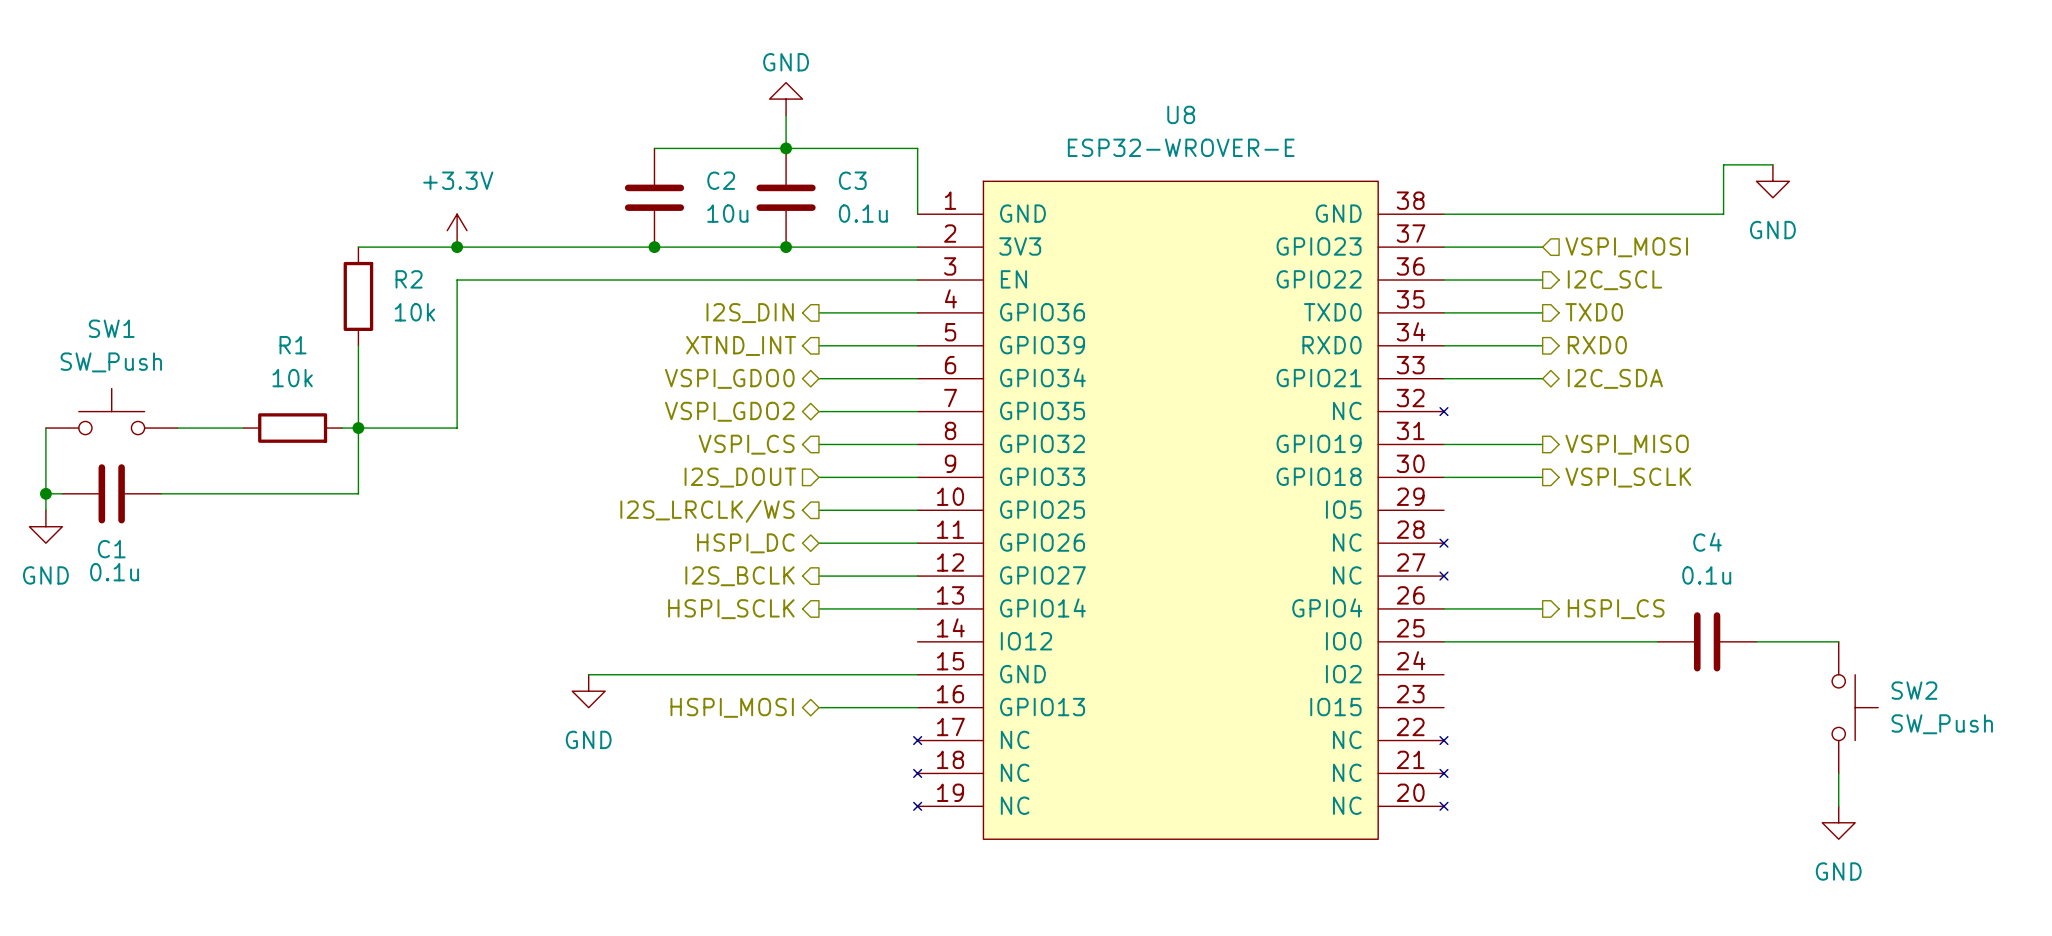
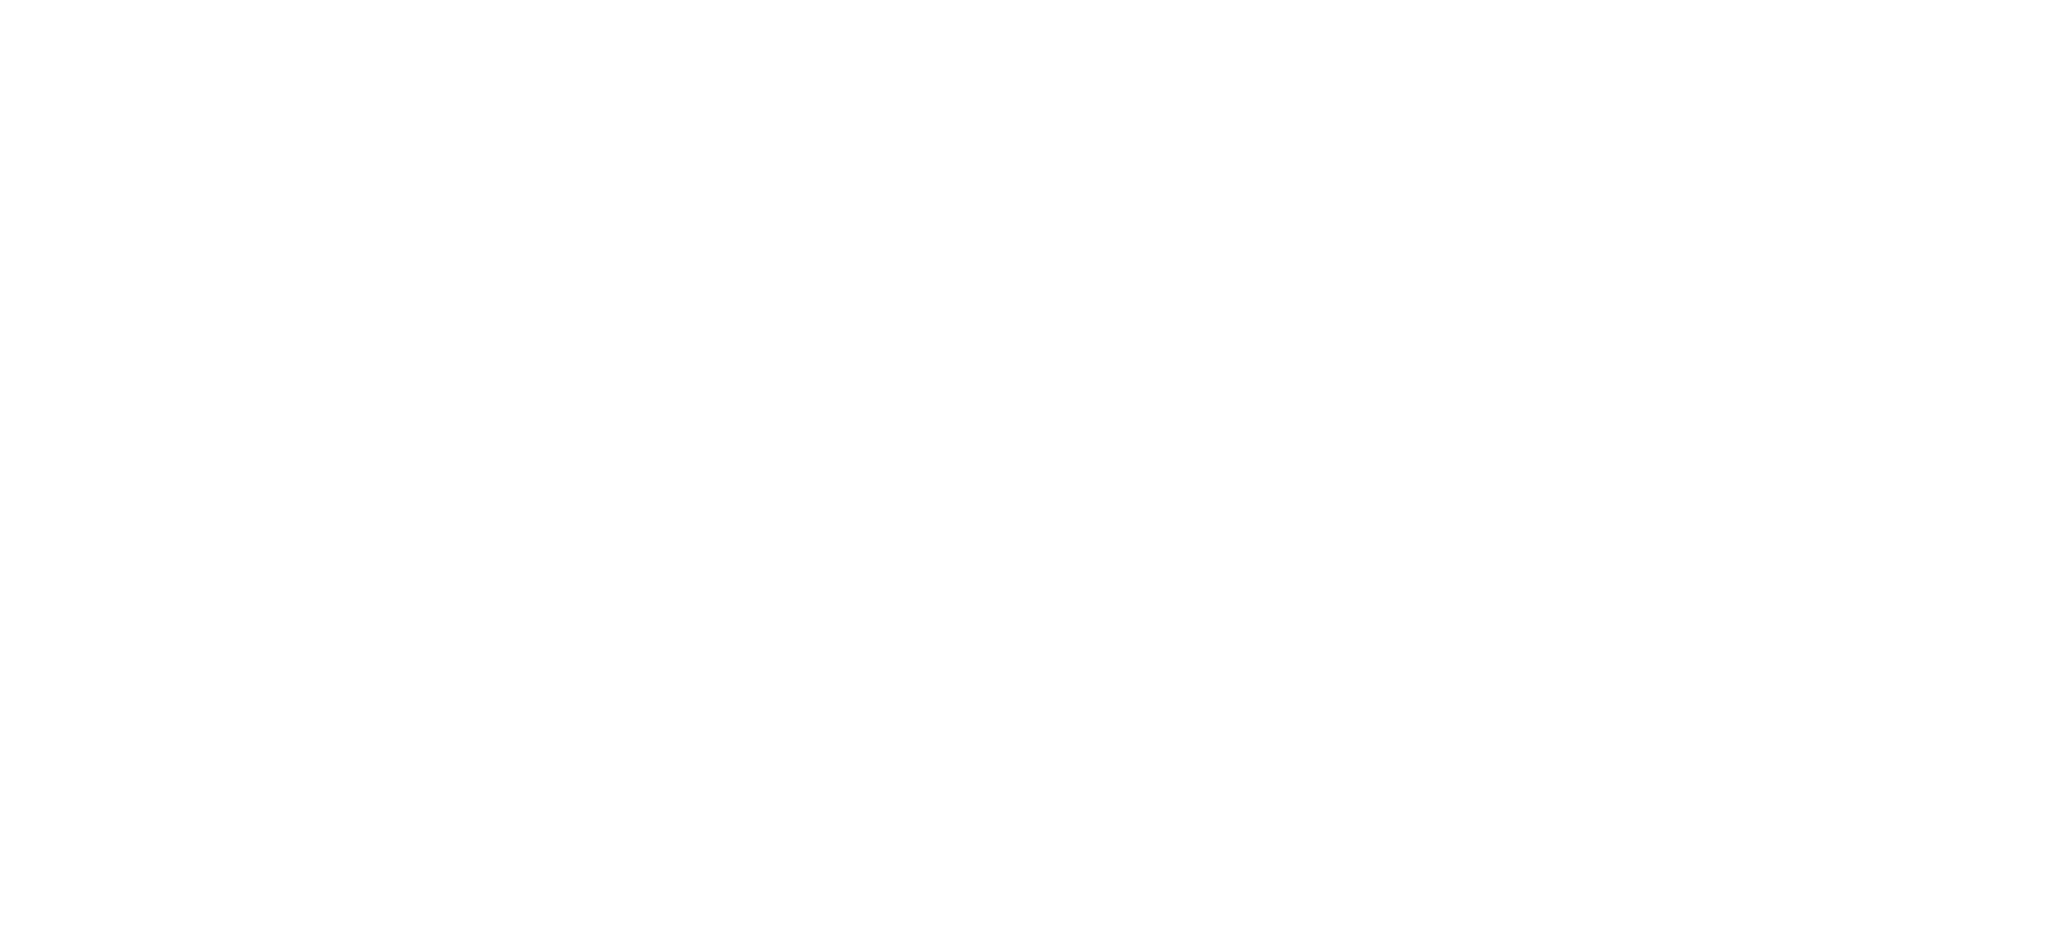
power symbol: GND (786, 99) -> none
wire: (786, 115) (786, 148) -> none
wire: (654, 148) (917, 148) (917, 214) -> none
junction: (786, 148) -> none
wire: (1772, 164) (1723, 164) (1723, 214) (1443, 214) -> none
power symbol: GND (1772, 181) -> none
C2: 10u (654, 197) -> none
C3: 0.1u (786, 197) -> none
power symbol: +3.3V (457, 230) -> none
wire: (358, 247) (917, 247) -> none
junction: (457, 247) -> none
junction: (654, 247) -> none
junction: (786, 247) -> none
wire: (1443, 247) (1542, 247) -> none
hierarchical label: VSPI_MOSI (1626, 247) -> none
wire: (917, 280) (457, 280) (457, 428) (341, 428) -> none
wire: (1443, 280) (1542, 280) -> none
hierarchical label: I2C_SCL (1614, 280) -> none
R2: 10k (358, 296) -> none
wire: (818, 312) (917, 312) -> none
wire: (1443, 312) (1542, 312) -> none
hierarchical label: TXD0 (1594, 312) -> none
hierarchical label: I2S_DIN (750, 313) -> none
wire: (358, 345) (358, 493) (161, 493) -> none
hierarchical label: XTND_INT (741, 345) -> none
wire: (818, 345) (917, 345) -> none
wire: (1443, 345) (1542, 345) -> none
hierarchical label: RXD0 (1597, 345) -> none
hierarchical label: VSPI_GDO0 (729, 378) -> none
wire: (818, 378) (917, 378) -> none
wire: (1443, 378) (1542, 378) -> none
hierarchical label: I2C_SDA (1615, 378) -> none
SW1: SW_Push (111, 411) -> none
hierarchical label: VSPI_GDO2 (729, 411) -> none
wire: (818, 411) (917, 411) -> none
wire: (45, 428) (45, 510) -> none
wire: (177, 428) (243, 428) -> none
R1: 10k (292, 428) -> none
junction: (358, 428) -> none
hierarchical label: VSPI_CS (746, 444) -> none
wire: (818, 444) (917, 444) -> none
wire: (1443, 444) (1542, 444) -> none
hierarchical label: VSPI_MISO (1627, 444) -> none
hierarchical label: I2S_DOUT (740, 477) -> none
wire: (818, 477) (917, 477) -> none
wire: (1443, 477) (1542, 477) -> none
hierarchical label: VSPI_SCLK (1628, 477) -> none
wire: (45, 493) (62, 493) -> none
junction: (45, 493) -> none
C1: 0.1u (111, 493) -> none
wire: (818, 510) (917, 510) -> none
U8: ESP32-WROVER-E (1180, 510) -> none
hierarchical label: I2S_LRCLK/WS (707, 511) -> none
power symbol: GND (45, 526) -> none
hierarchical label: HSPI_DC (745, 543) -> none
wire: (818, 543) (917, 543) -> none
hierarchical label: I2S_BCLK (739, 576) -> none
wire: (818, 576) (917, 576) -> none
wire: (818, 608) (917, 608) -> none
wire: (1443, 608) (1542, 608) -> none
hierarchical label: HSPI_SCLK (731, 609) -> none
hierarchical label: HSPI_CS (1616, 609) -> none
wire: (1443, 641) (1657, 641) -> none
C4: 0.1u (1707, 641) -> none
wire: (1756, 641) (1838, 641) -> none
wire: (588, 674) (917, 674) -> none
power symbol: GND (588, 691) -> none
hierarchical label: HSPI_MOSI (732, 707) -> none
wire: (818, 707) (917, 707) -> none
SW2: SW_Push (1855, 707) -> none
wire: (1838, 773) (1838, 806) -> none
power symbol: GND (1838, 822) -> none

